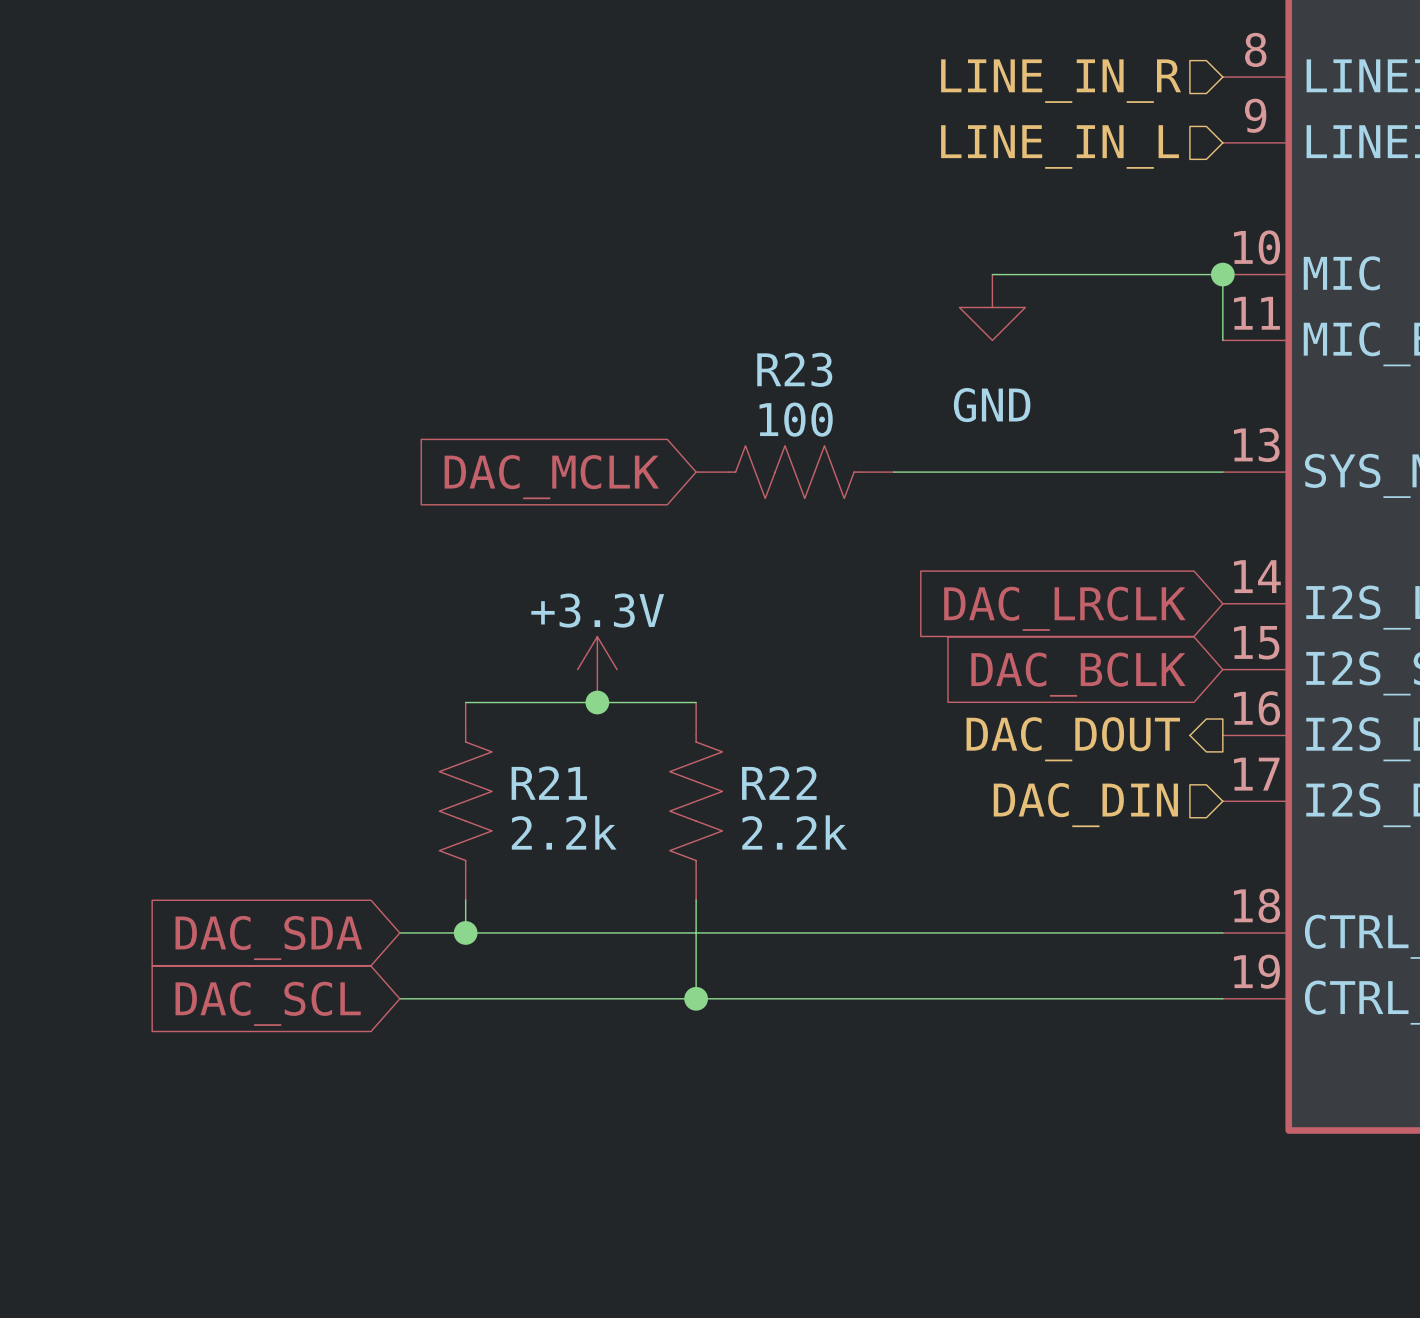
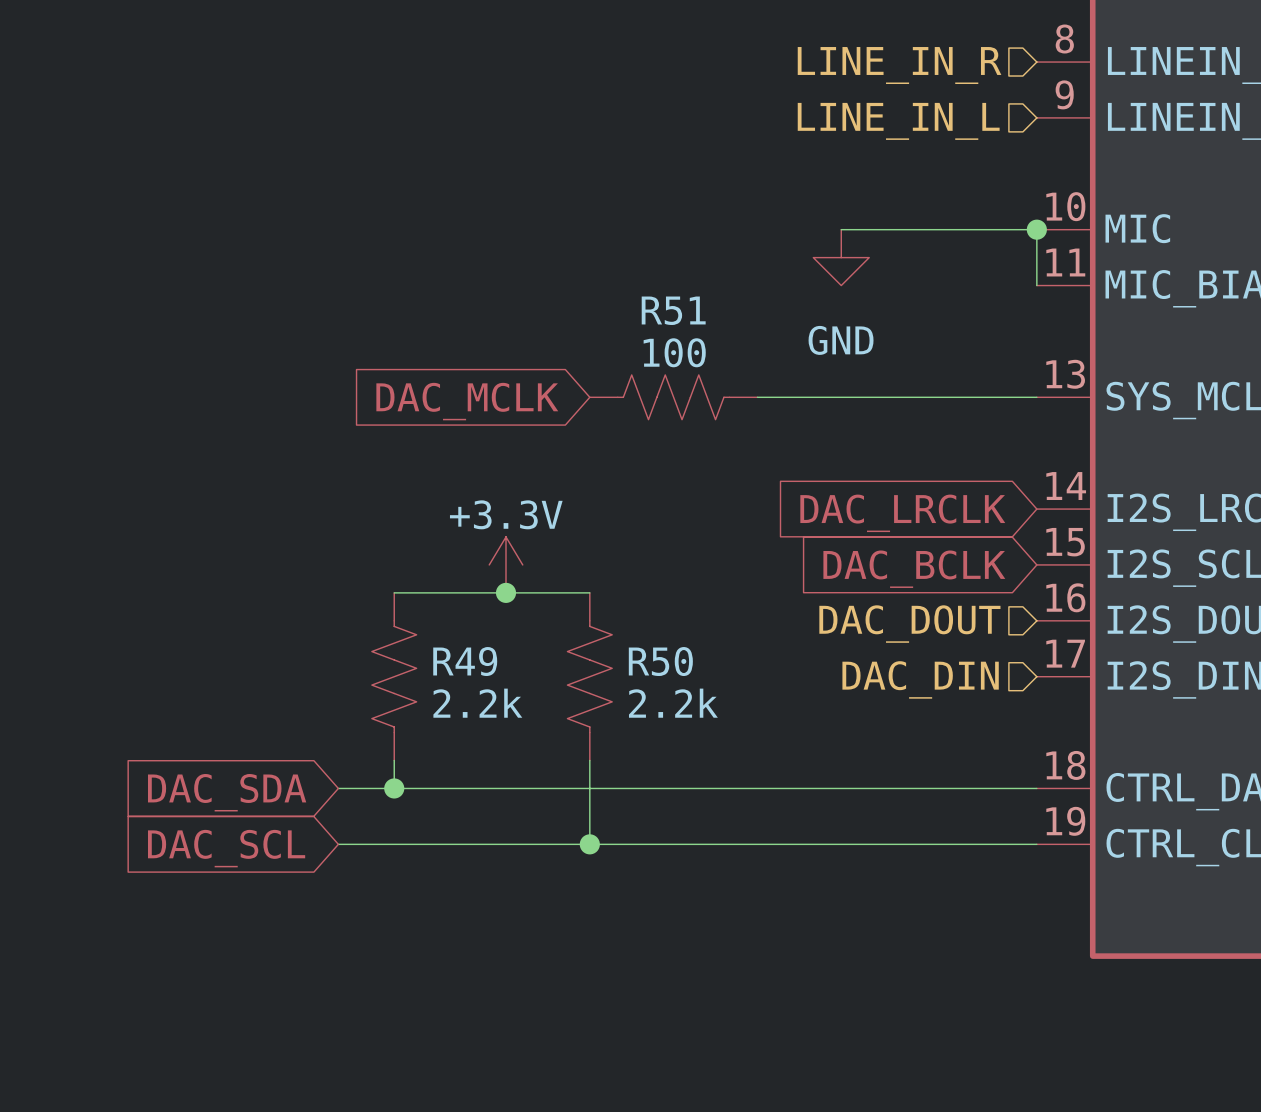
R23 name: R23 (794, 369) -> R51 (673, 310)
hierarchical label shape: output (1073, 739) -> input (909, 624)
R21 name: R21 (549, 783) -> R49 (465, 661)
R22 name: R22 (779, 783) -> R50 (660, 661)

